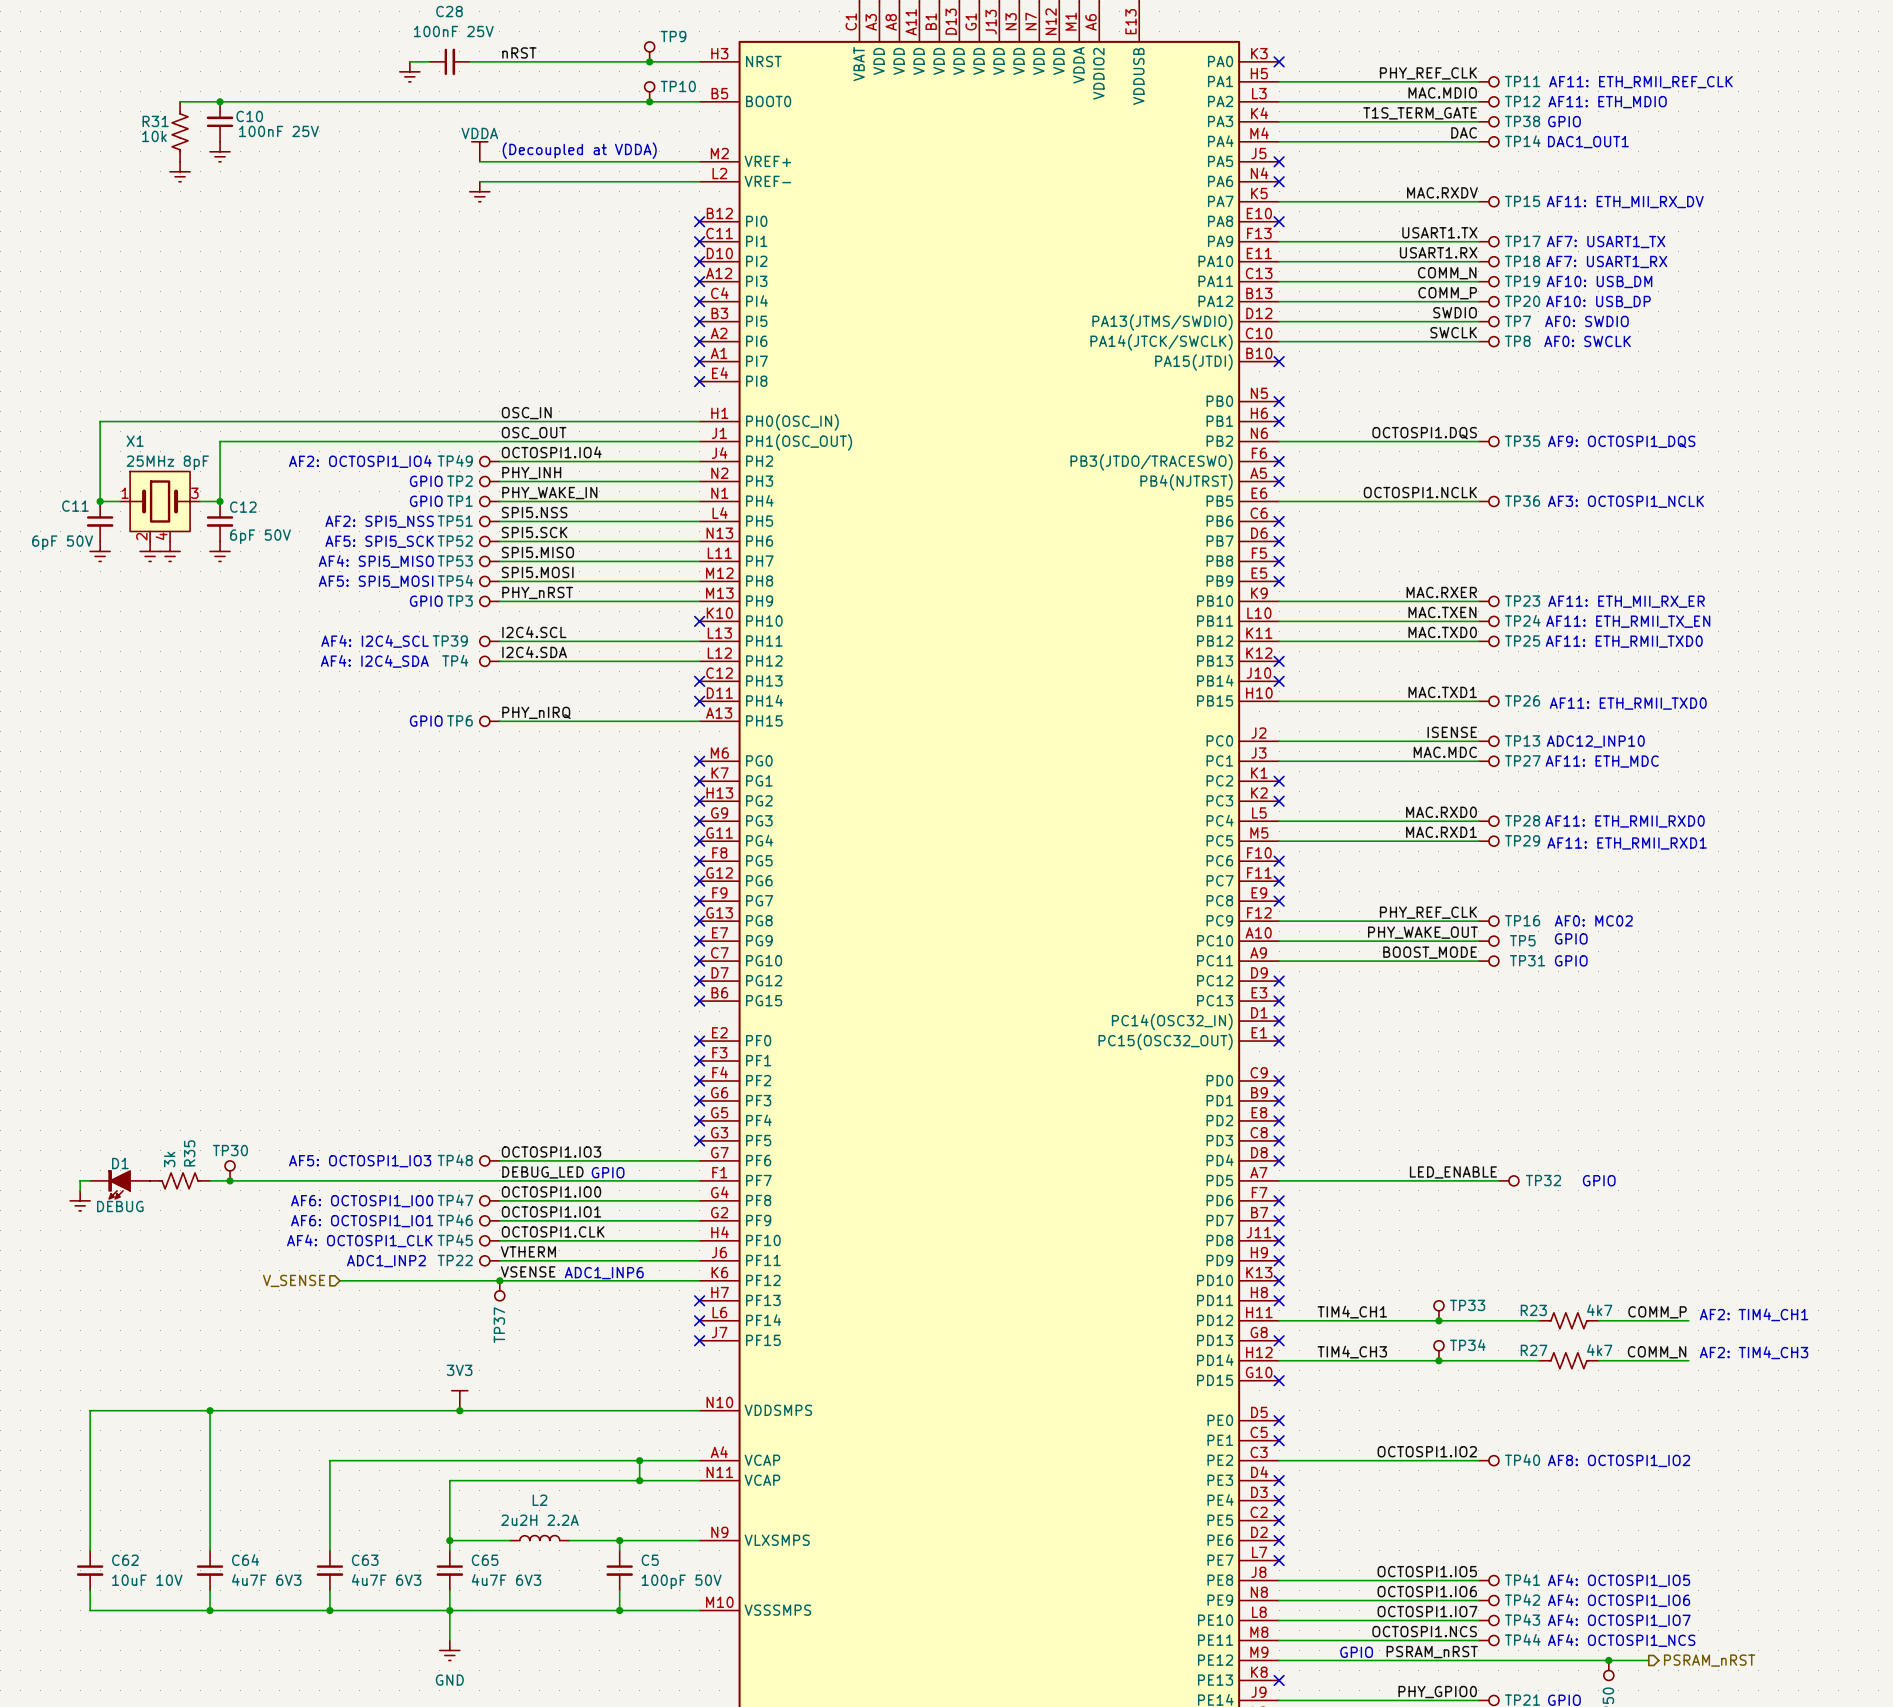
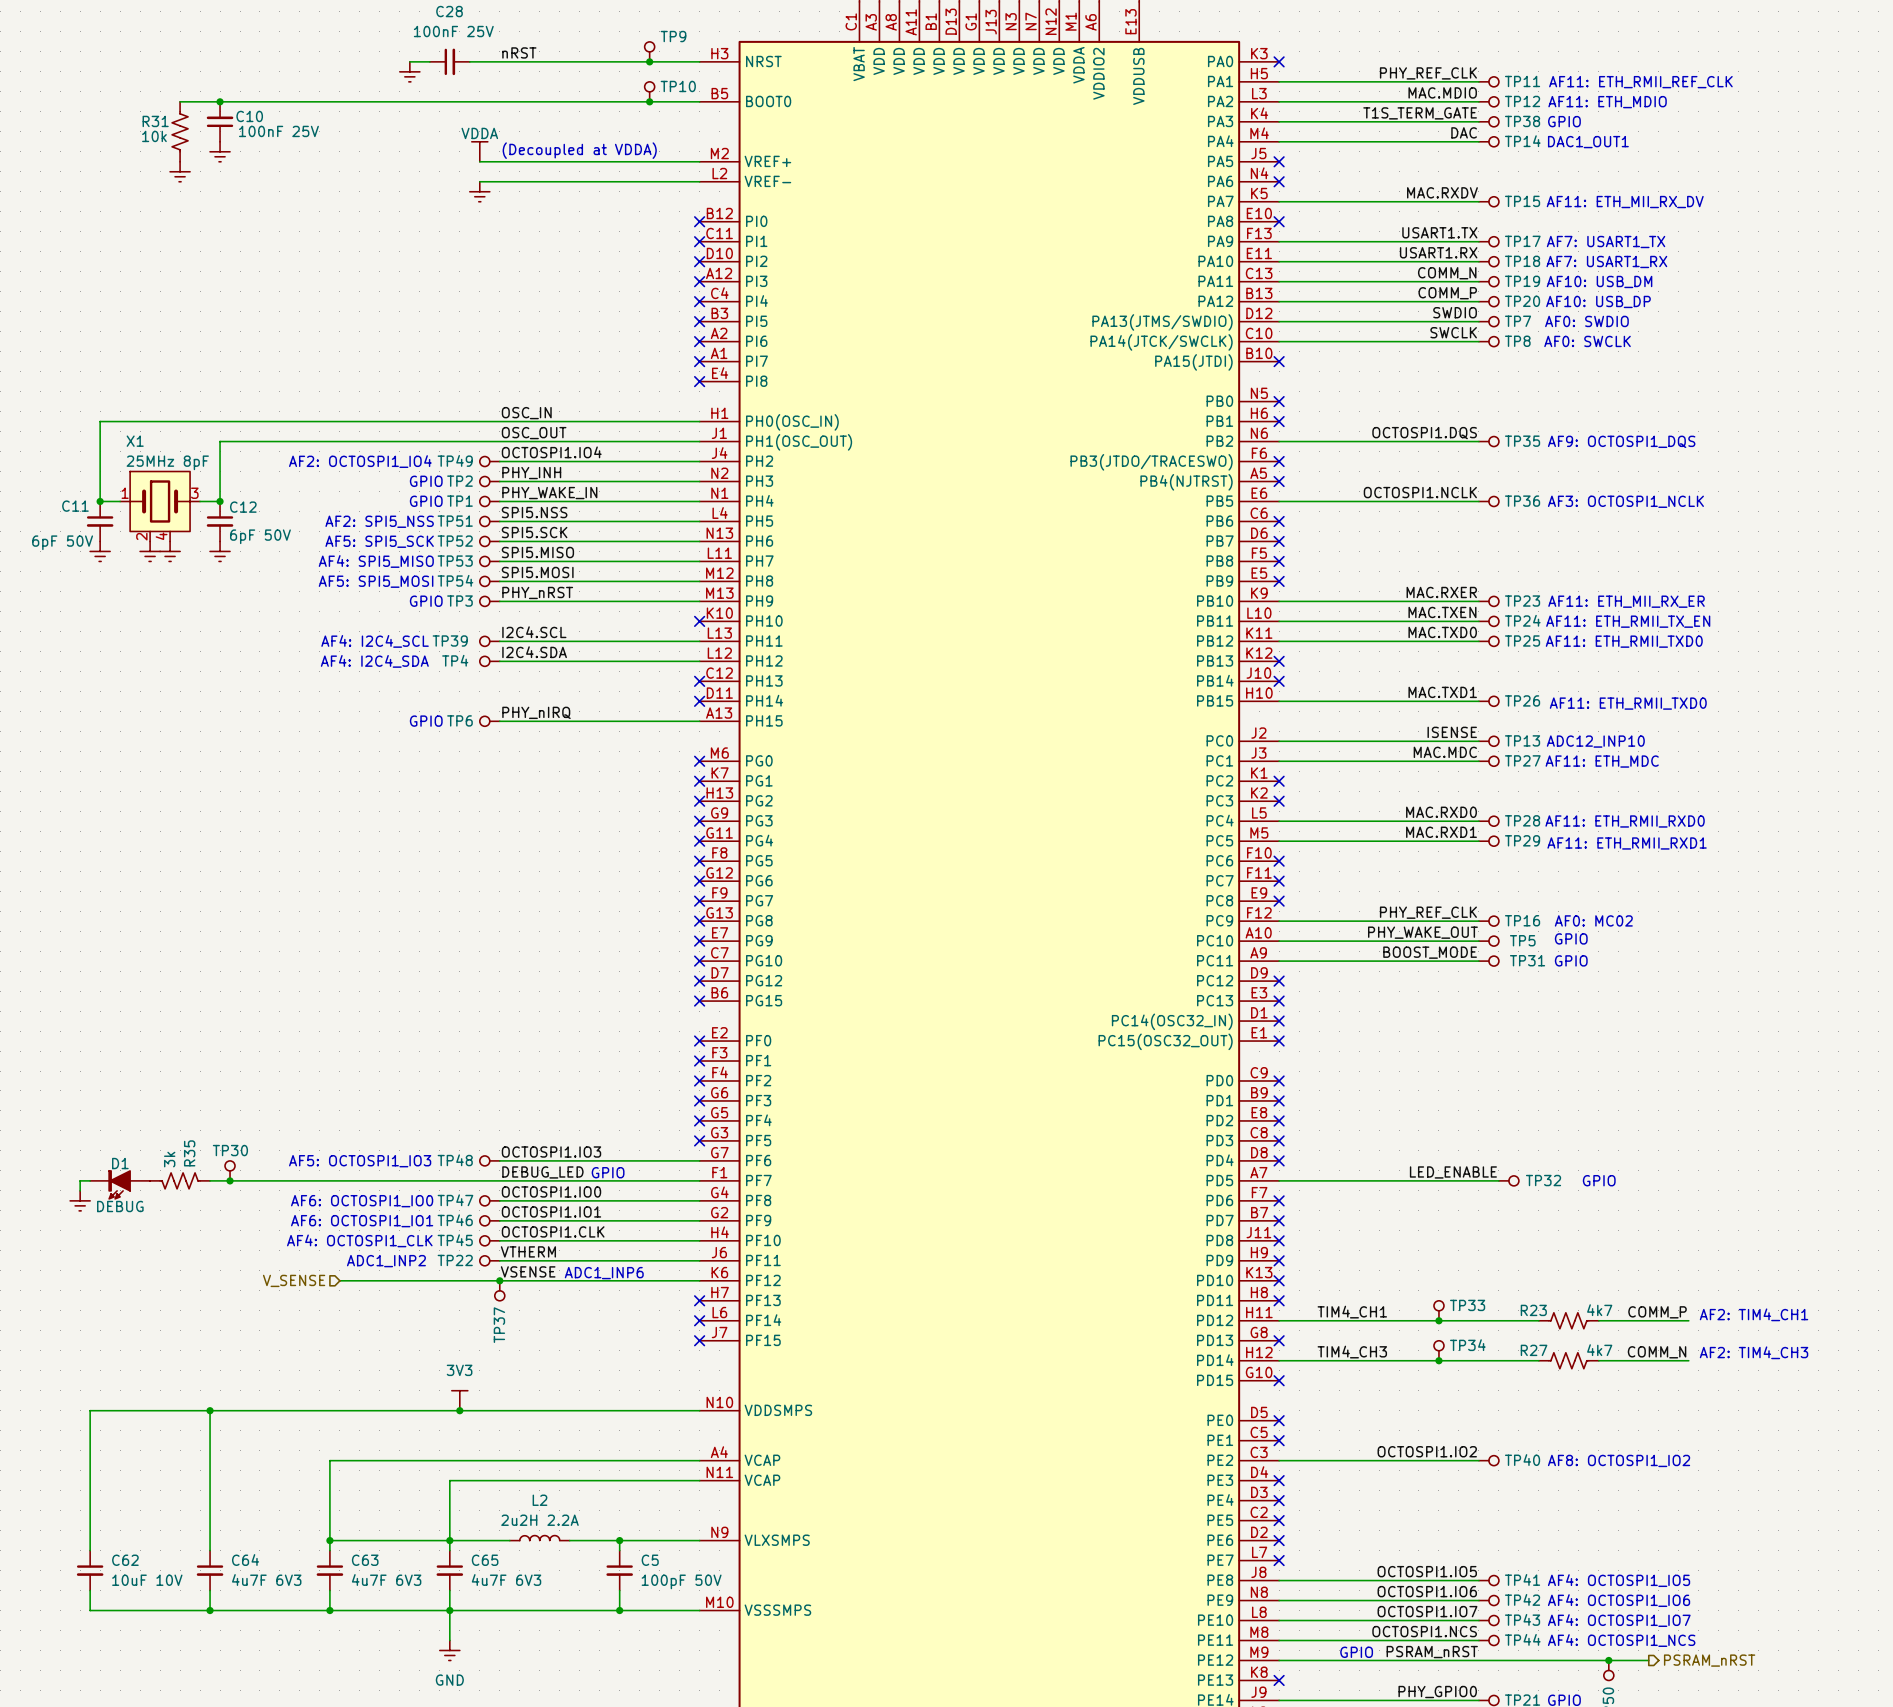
wire: (639, 1460) (639, 1480) -> none
junction: (639, 1460) -> none
junction: (639, 1480) -> none
wire: none -> (329, 1540) (449, 1540)
junction: none -> (329, 1540)

